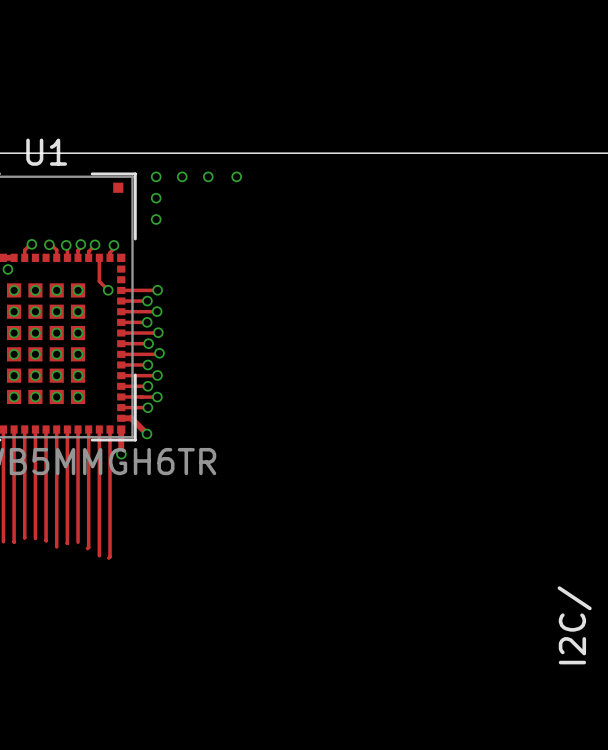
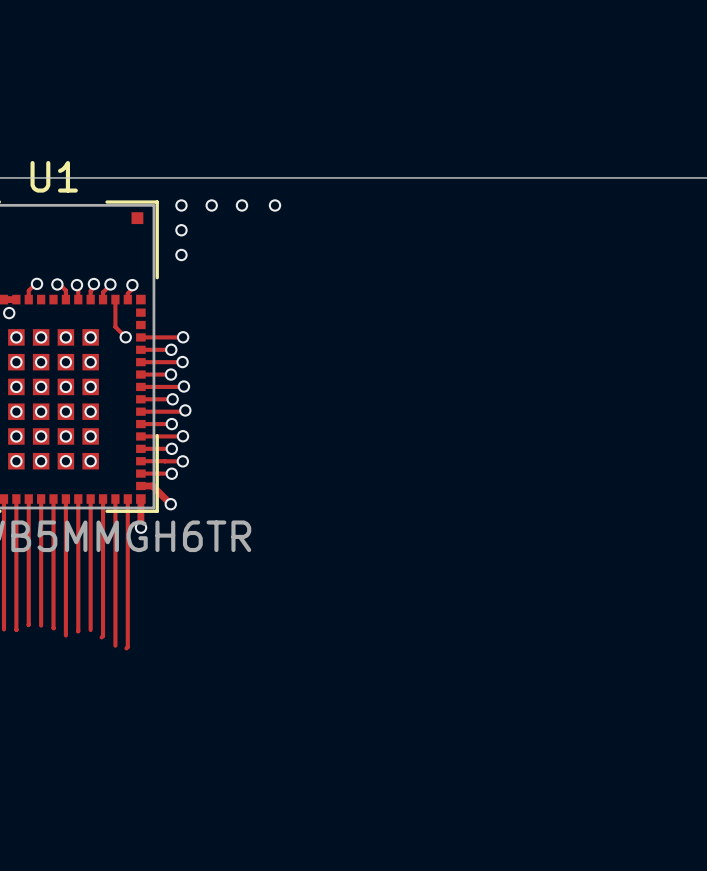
text: I2C/ (574, 625) -> none

